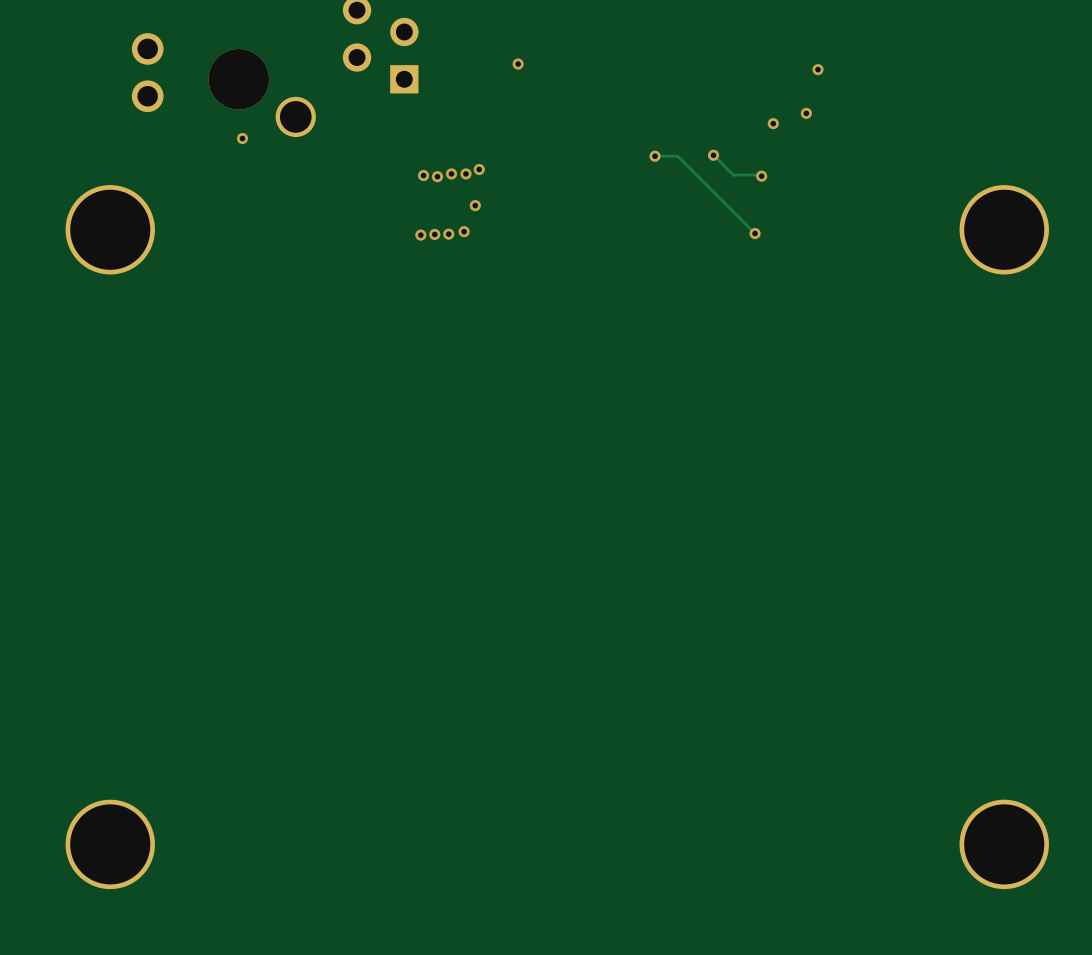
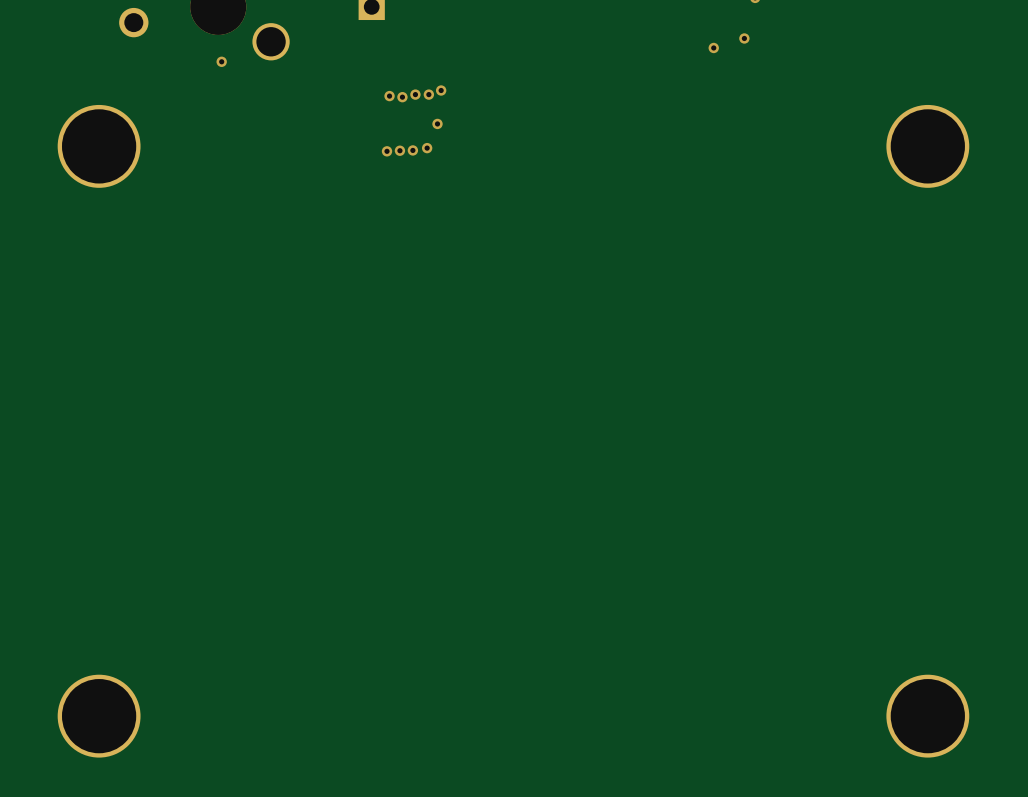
track: (713, 155) (733, 175) (761, 176) -> none
via: (713, 155) -> none
track: (655, 156) (677, 156) (755, 233) -> none
via: (655, 156) -> none
via: (761, 176) -> none
via: (755, 233) -> none

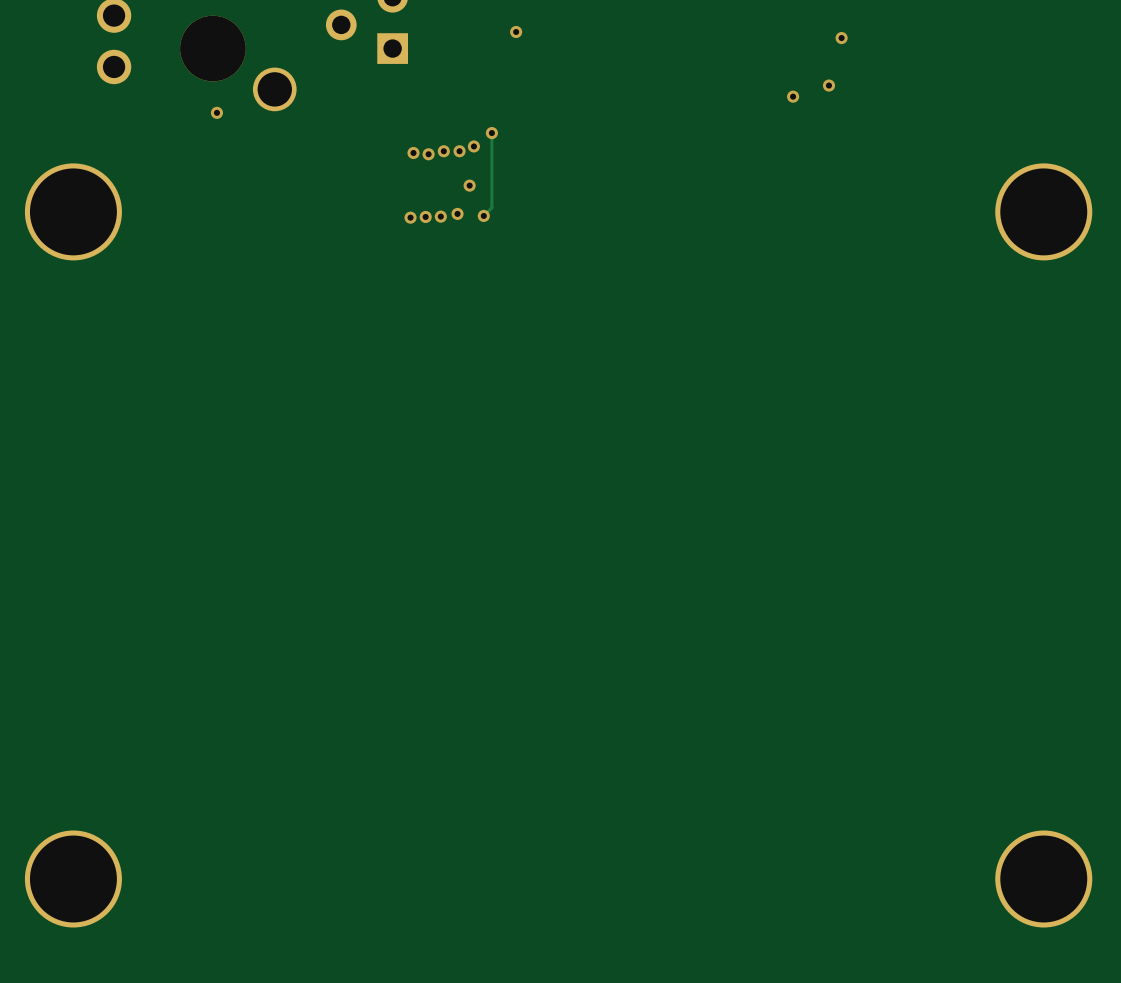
track: none -> (491, 133) (491, 207) (483, 215)
via: none -> (491, 133)
via: none -> (483, 215)

